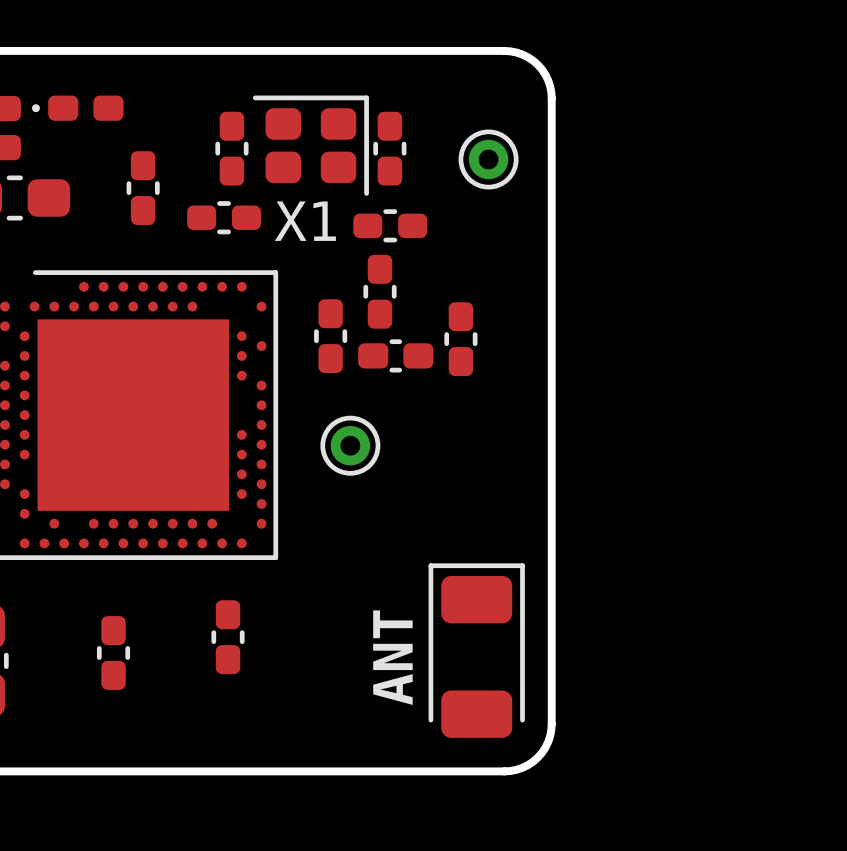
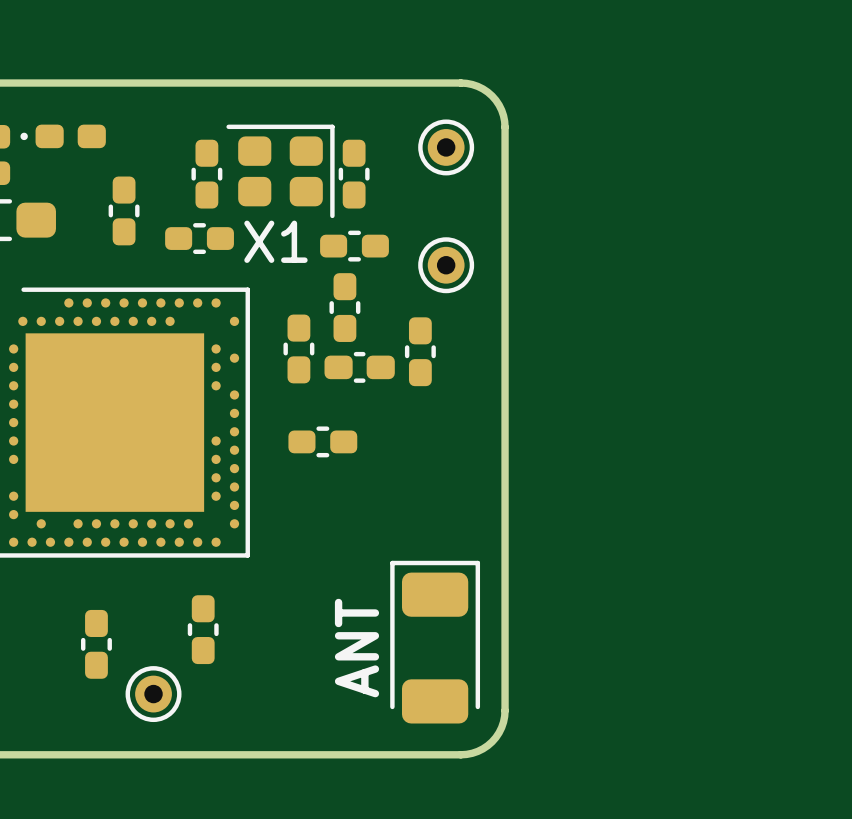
part position: (488, 159) -> (446, 147)
part: none -> (446, 265)
part footprint: [320, 415, 381, 476] -> [288, 426, 358, 458]
part: none -> (153, 694)

